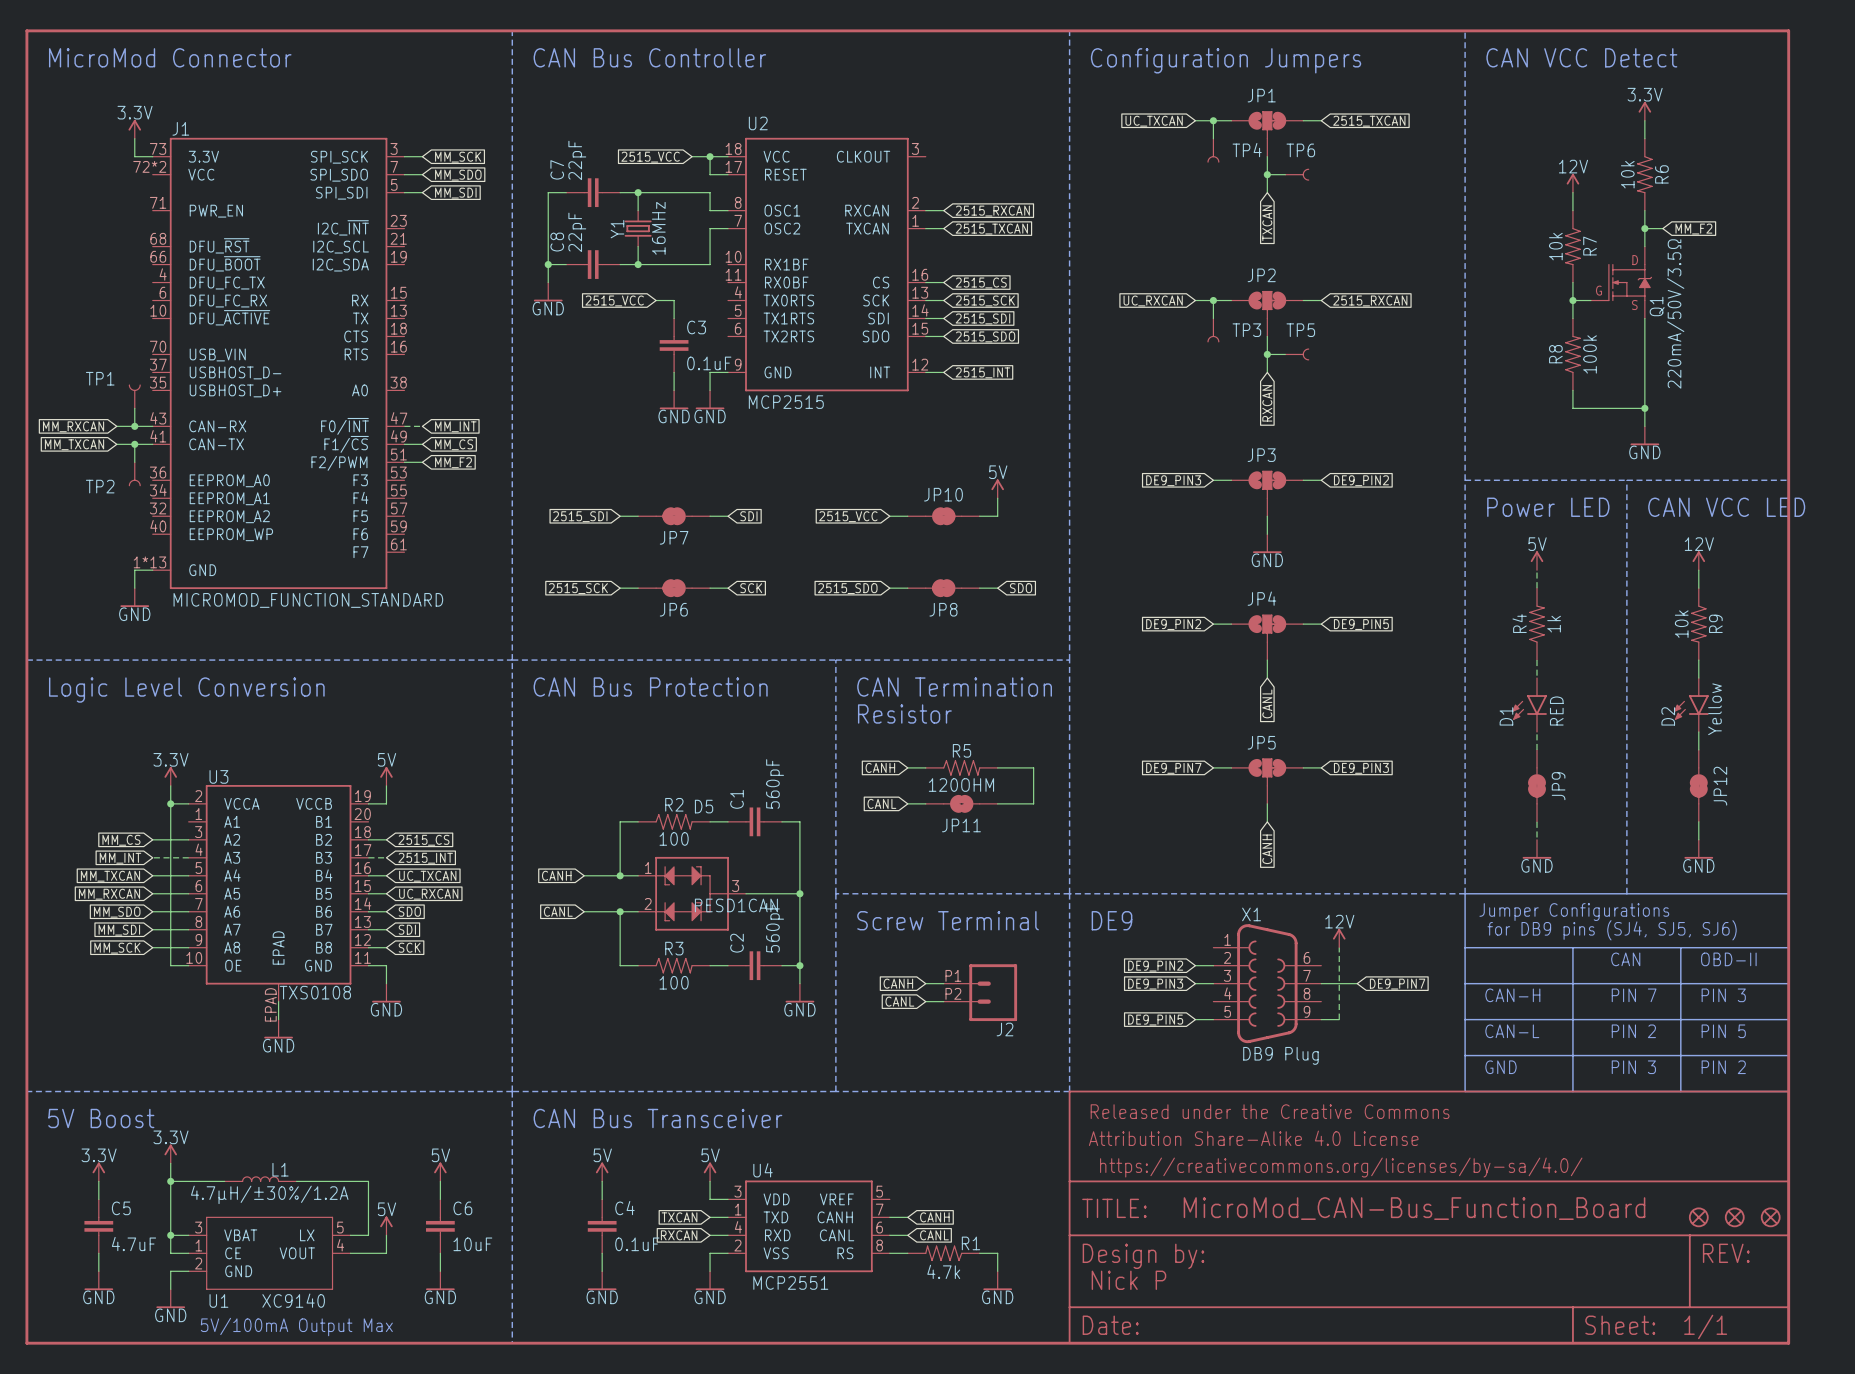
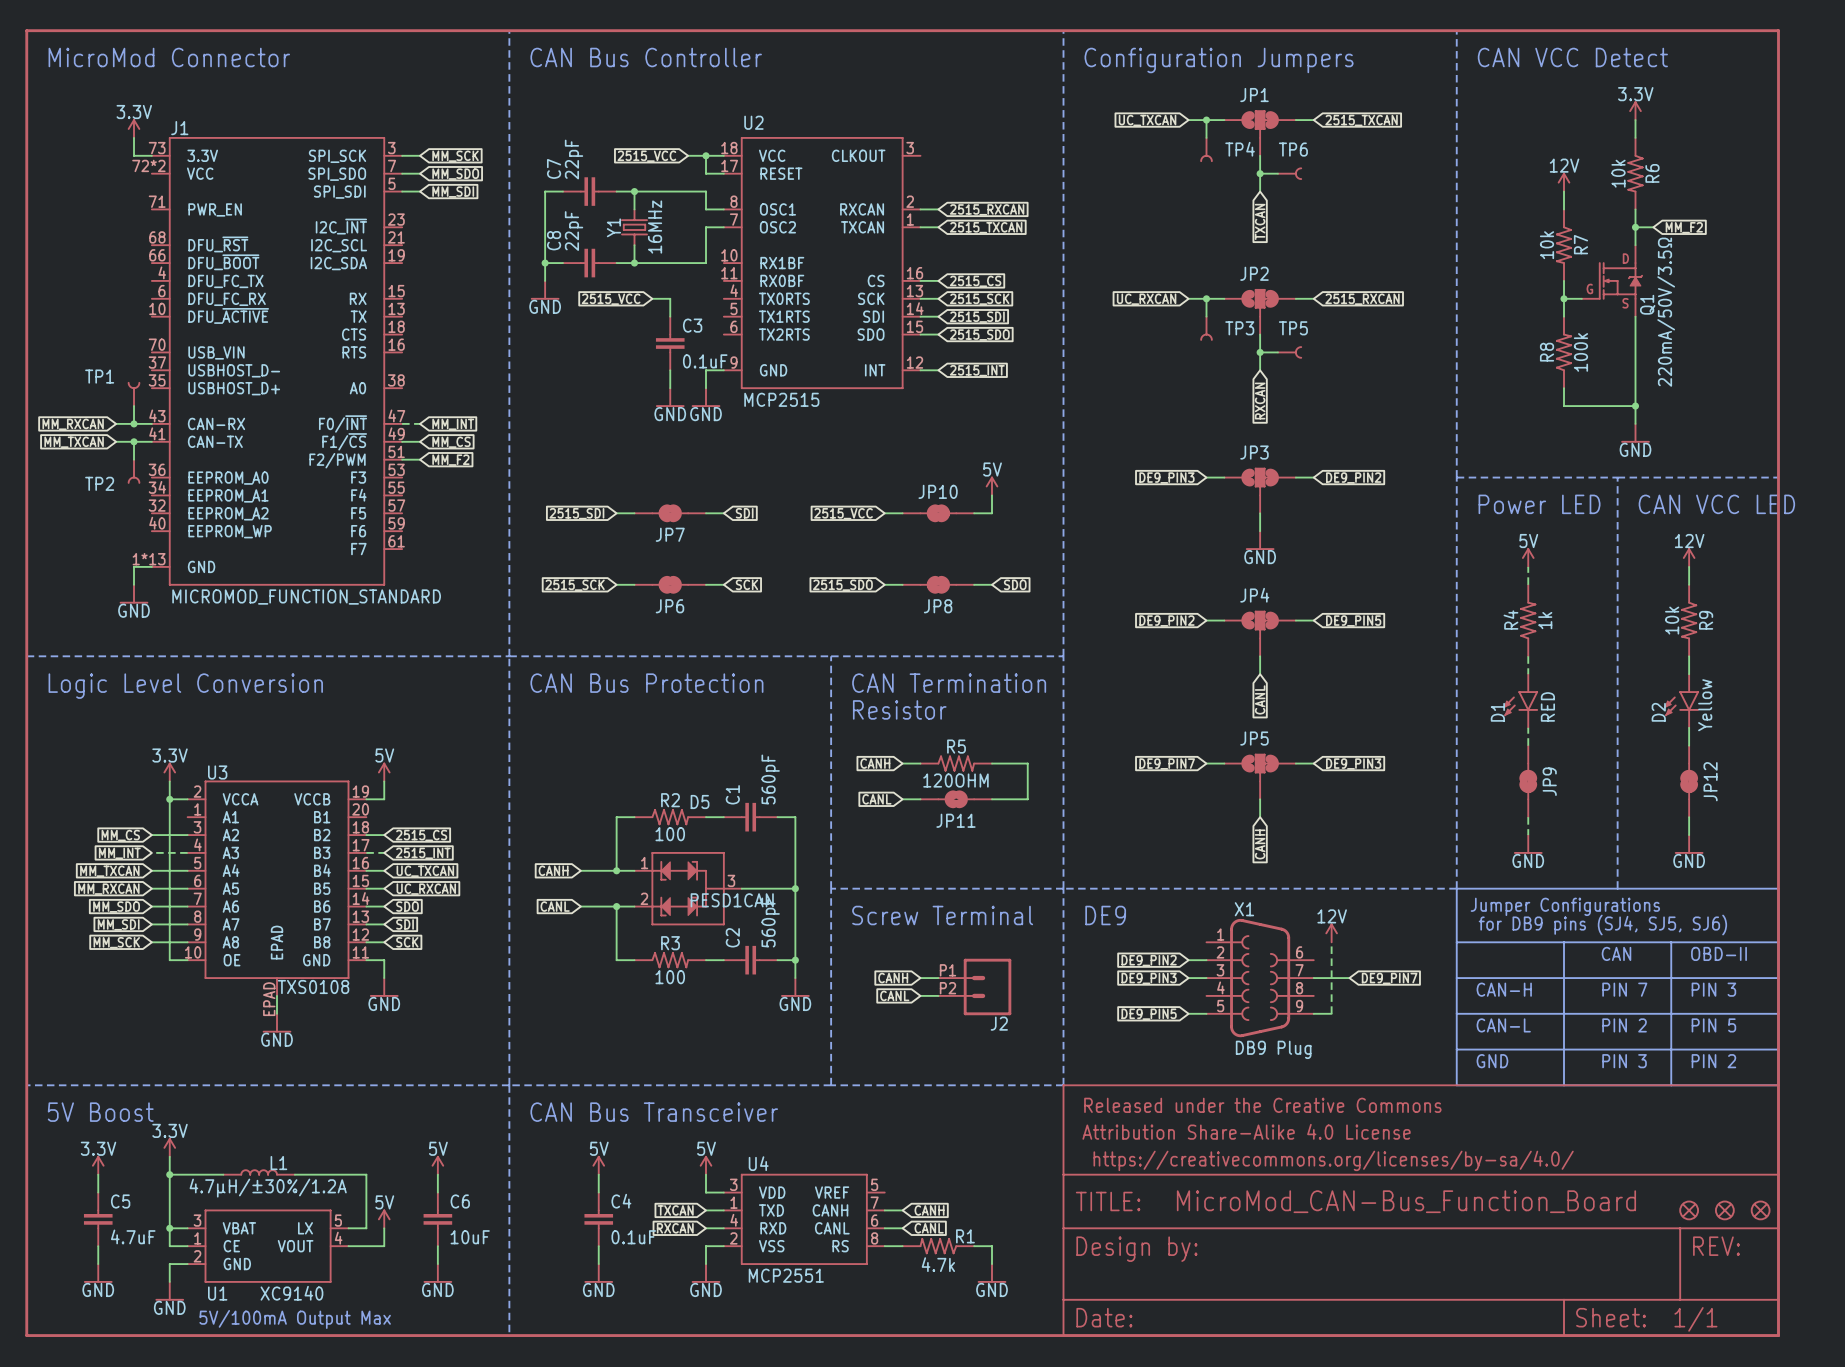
text: Nick P (1128, 1280) -> none

